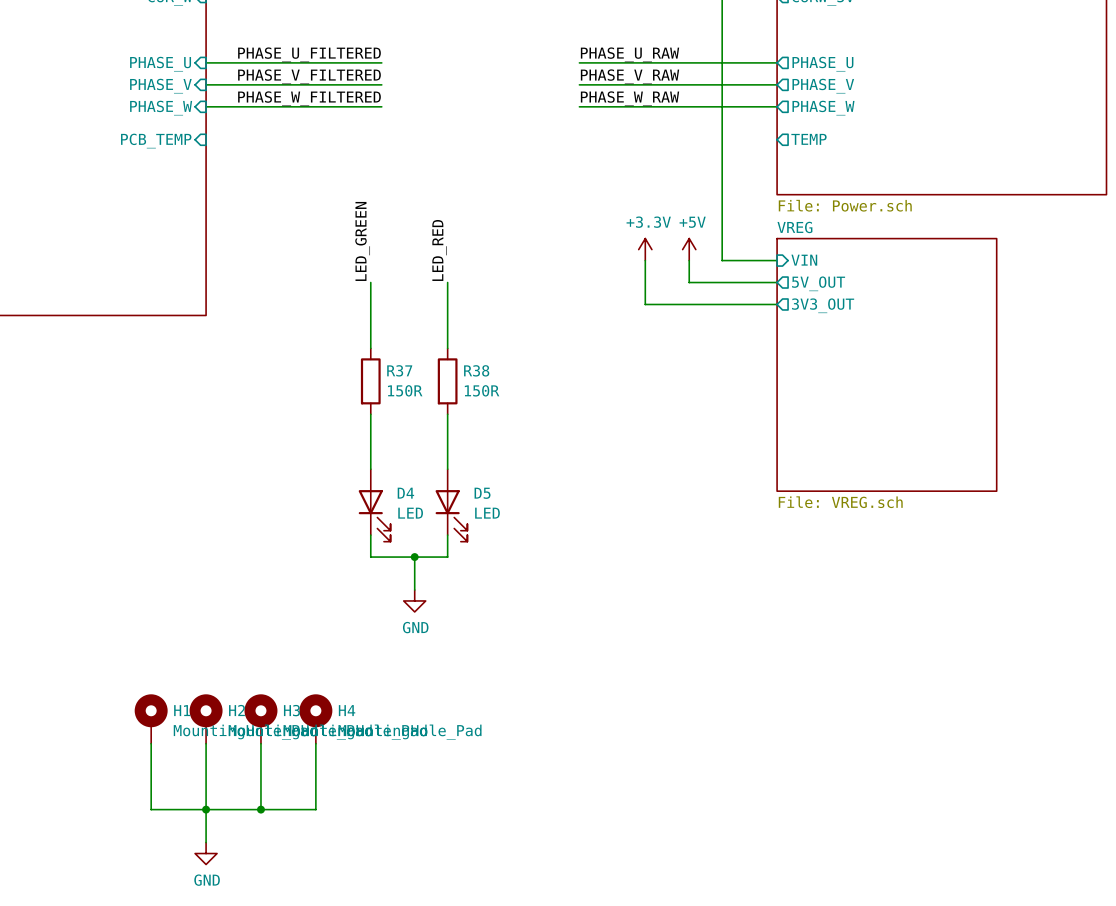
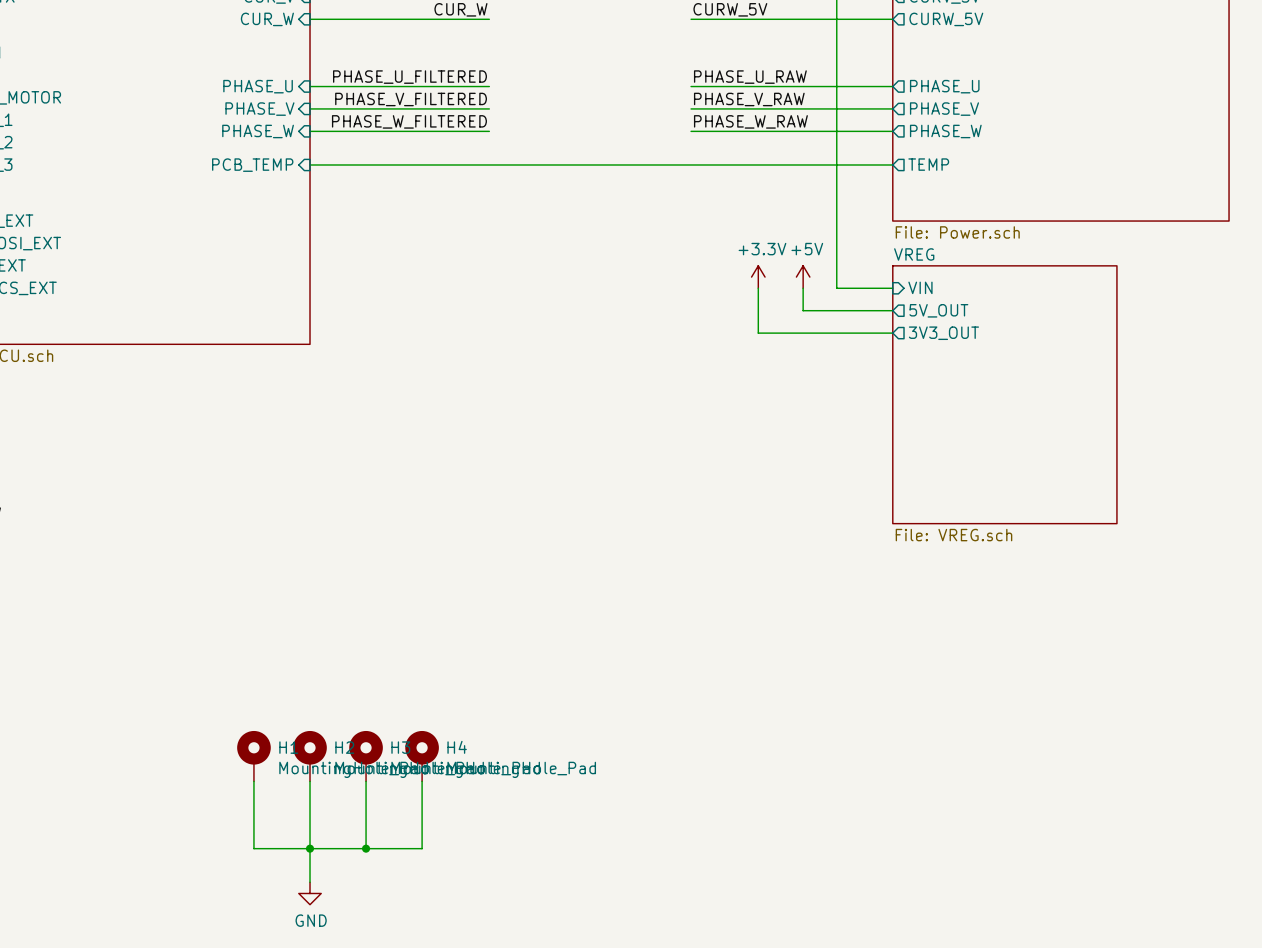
wire: none -> (310, 164) (892, 164)
label: LED_GREEN (362, 241) -> none
label: LED_RED (439, 250) -> none
wire: (370, 282) (370, 348) -> none
wire: (447, 282) (447, 348) -> none
R37: 150R (370, 381) -> none
R38: 150R (447, 381) -> none
wire: (370, 414) (370, 469) -> none
wire: (447, 414) (447, 469) -> none
D4: LED (374, 505) -> none
D5: LED (451, 505) -> none
wire: (370, 535) (370, 557) (447, 557) (447, 535) -> none
wire: (414, 557) (414, 589) -> none
junction: (414, 557) -> none
power symbol: GND (414, 600) -> none

